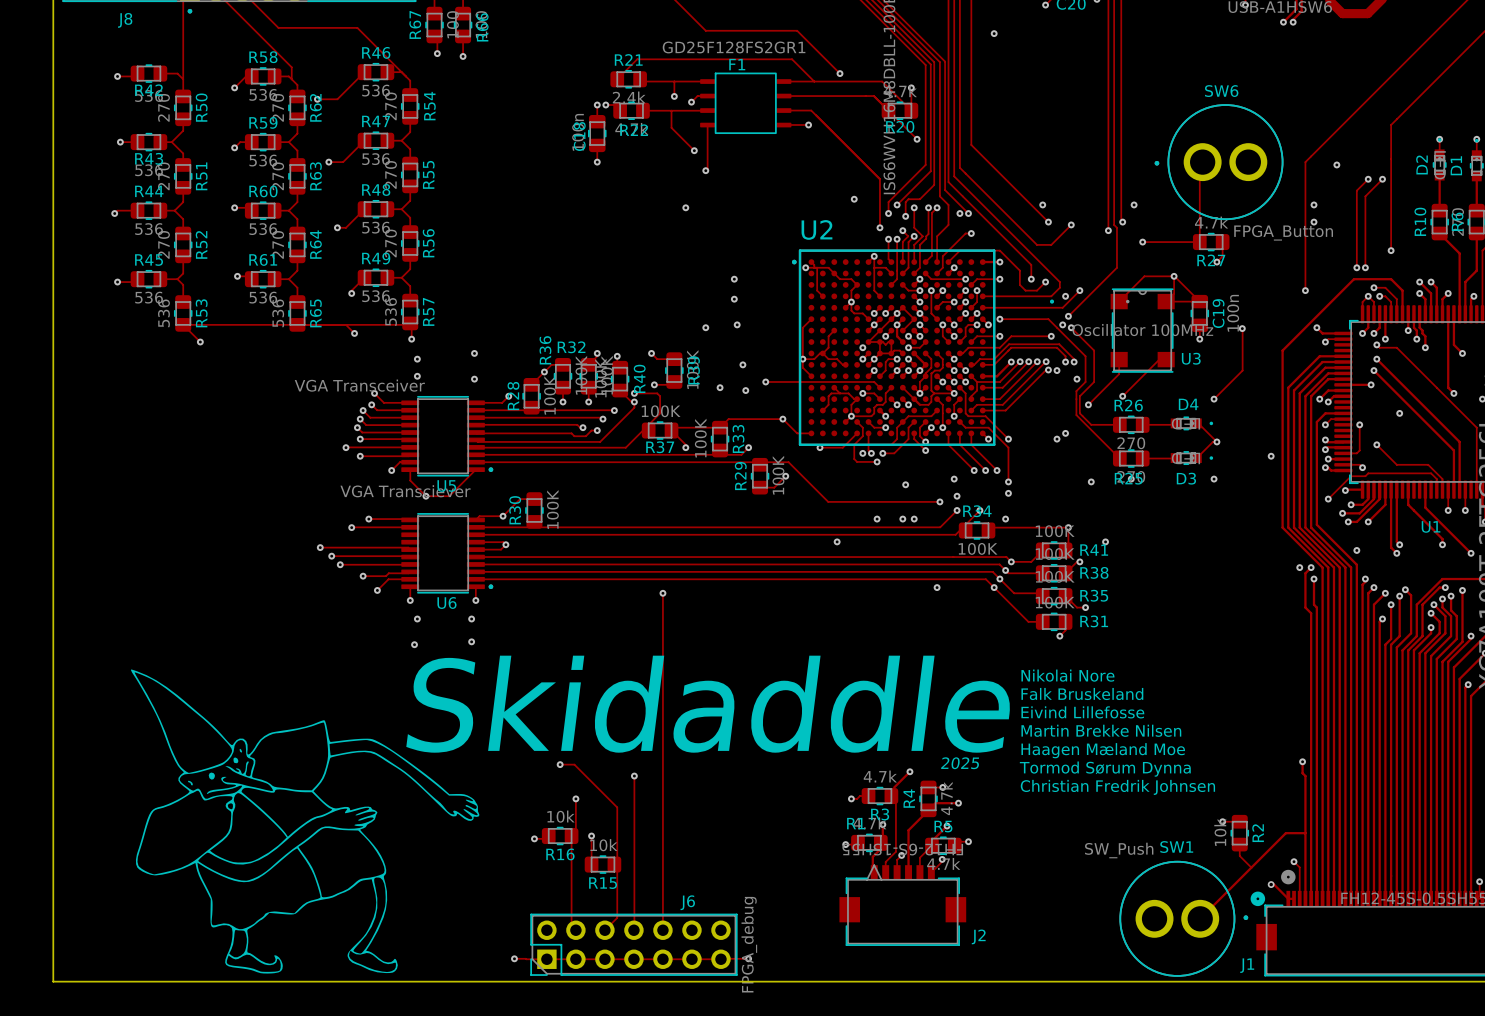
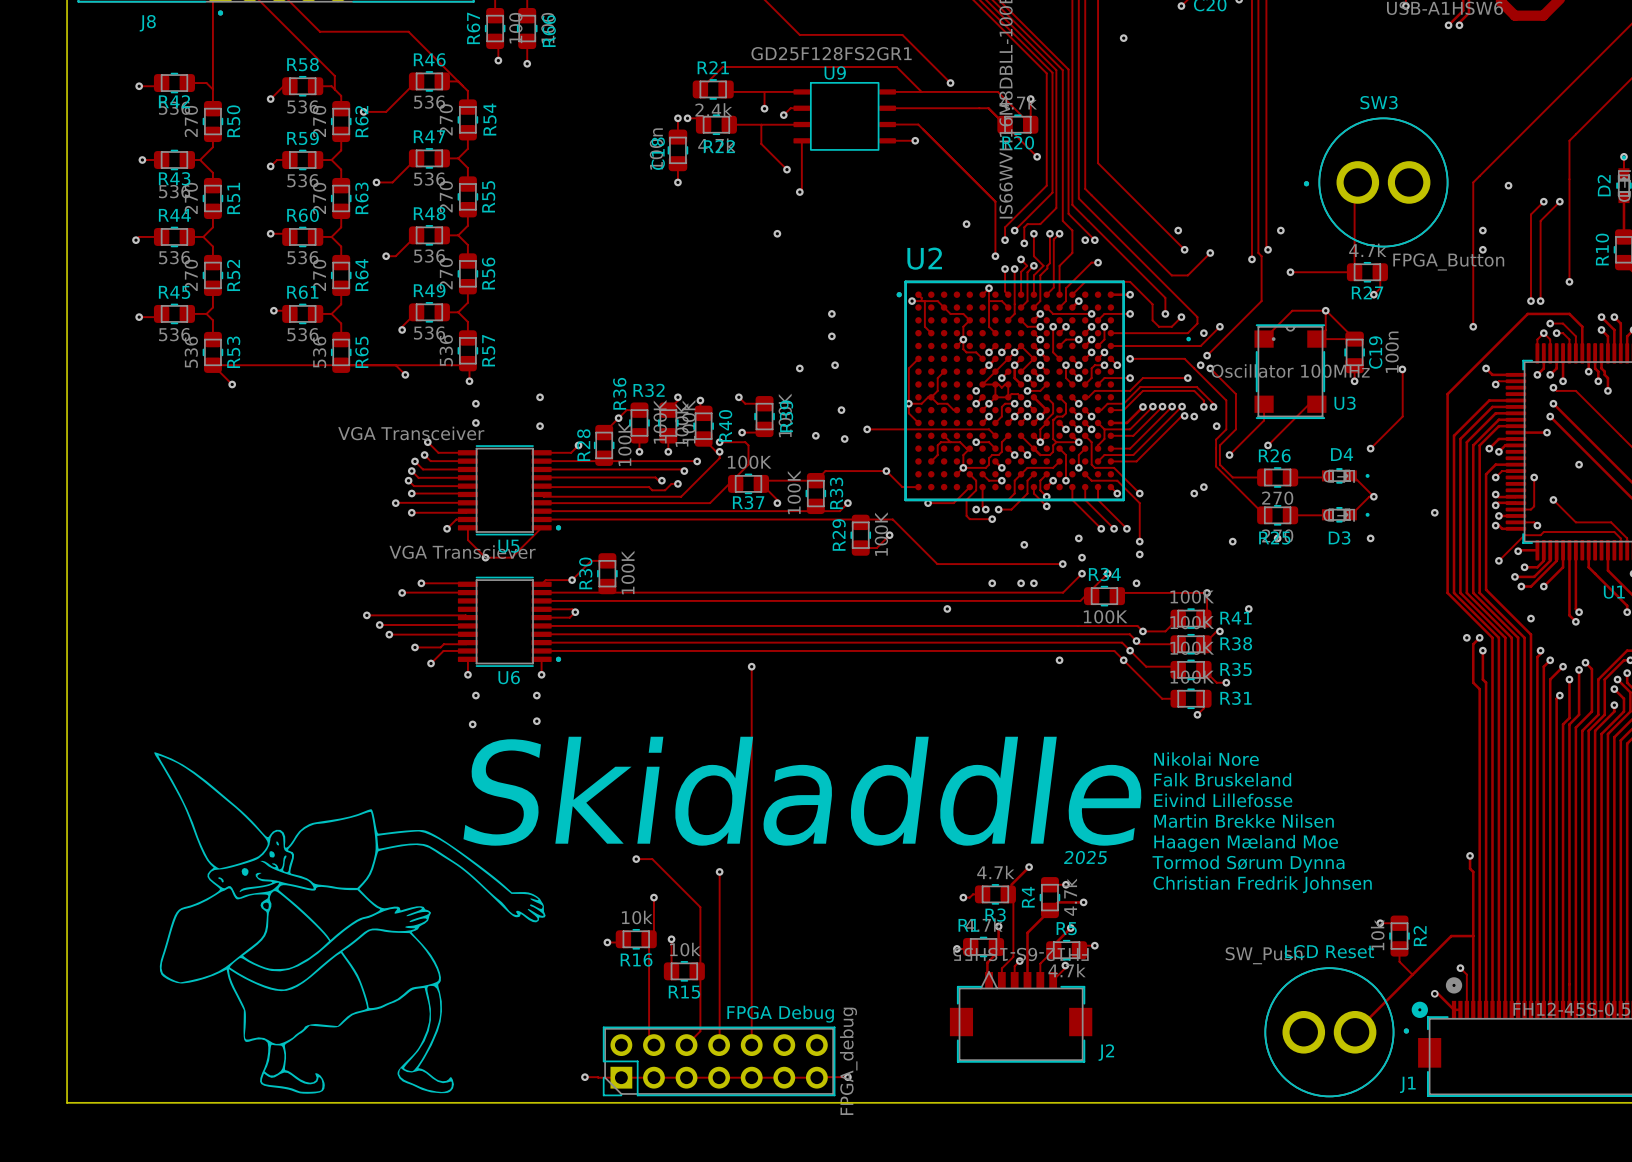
F1 name: F1 (737, 64) -> U9 (835, 72)
SW6 name: SW6 (1221, 91) -> SW3 (1379, 102)
SW1 name: SW1 (1176, 847) -> LCD Reset (1329, 951)
J6 name: J6 (687, 902) -> FPGA Debug (780, 1014)

